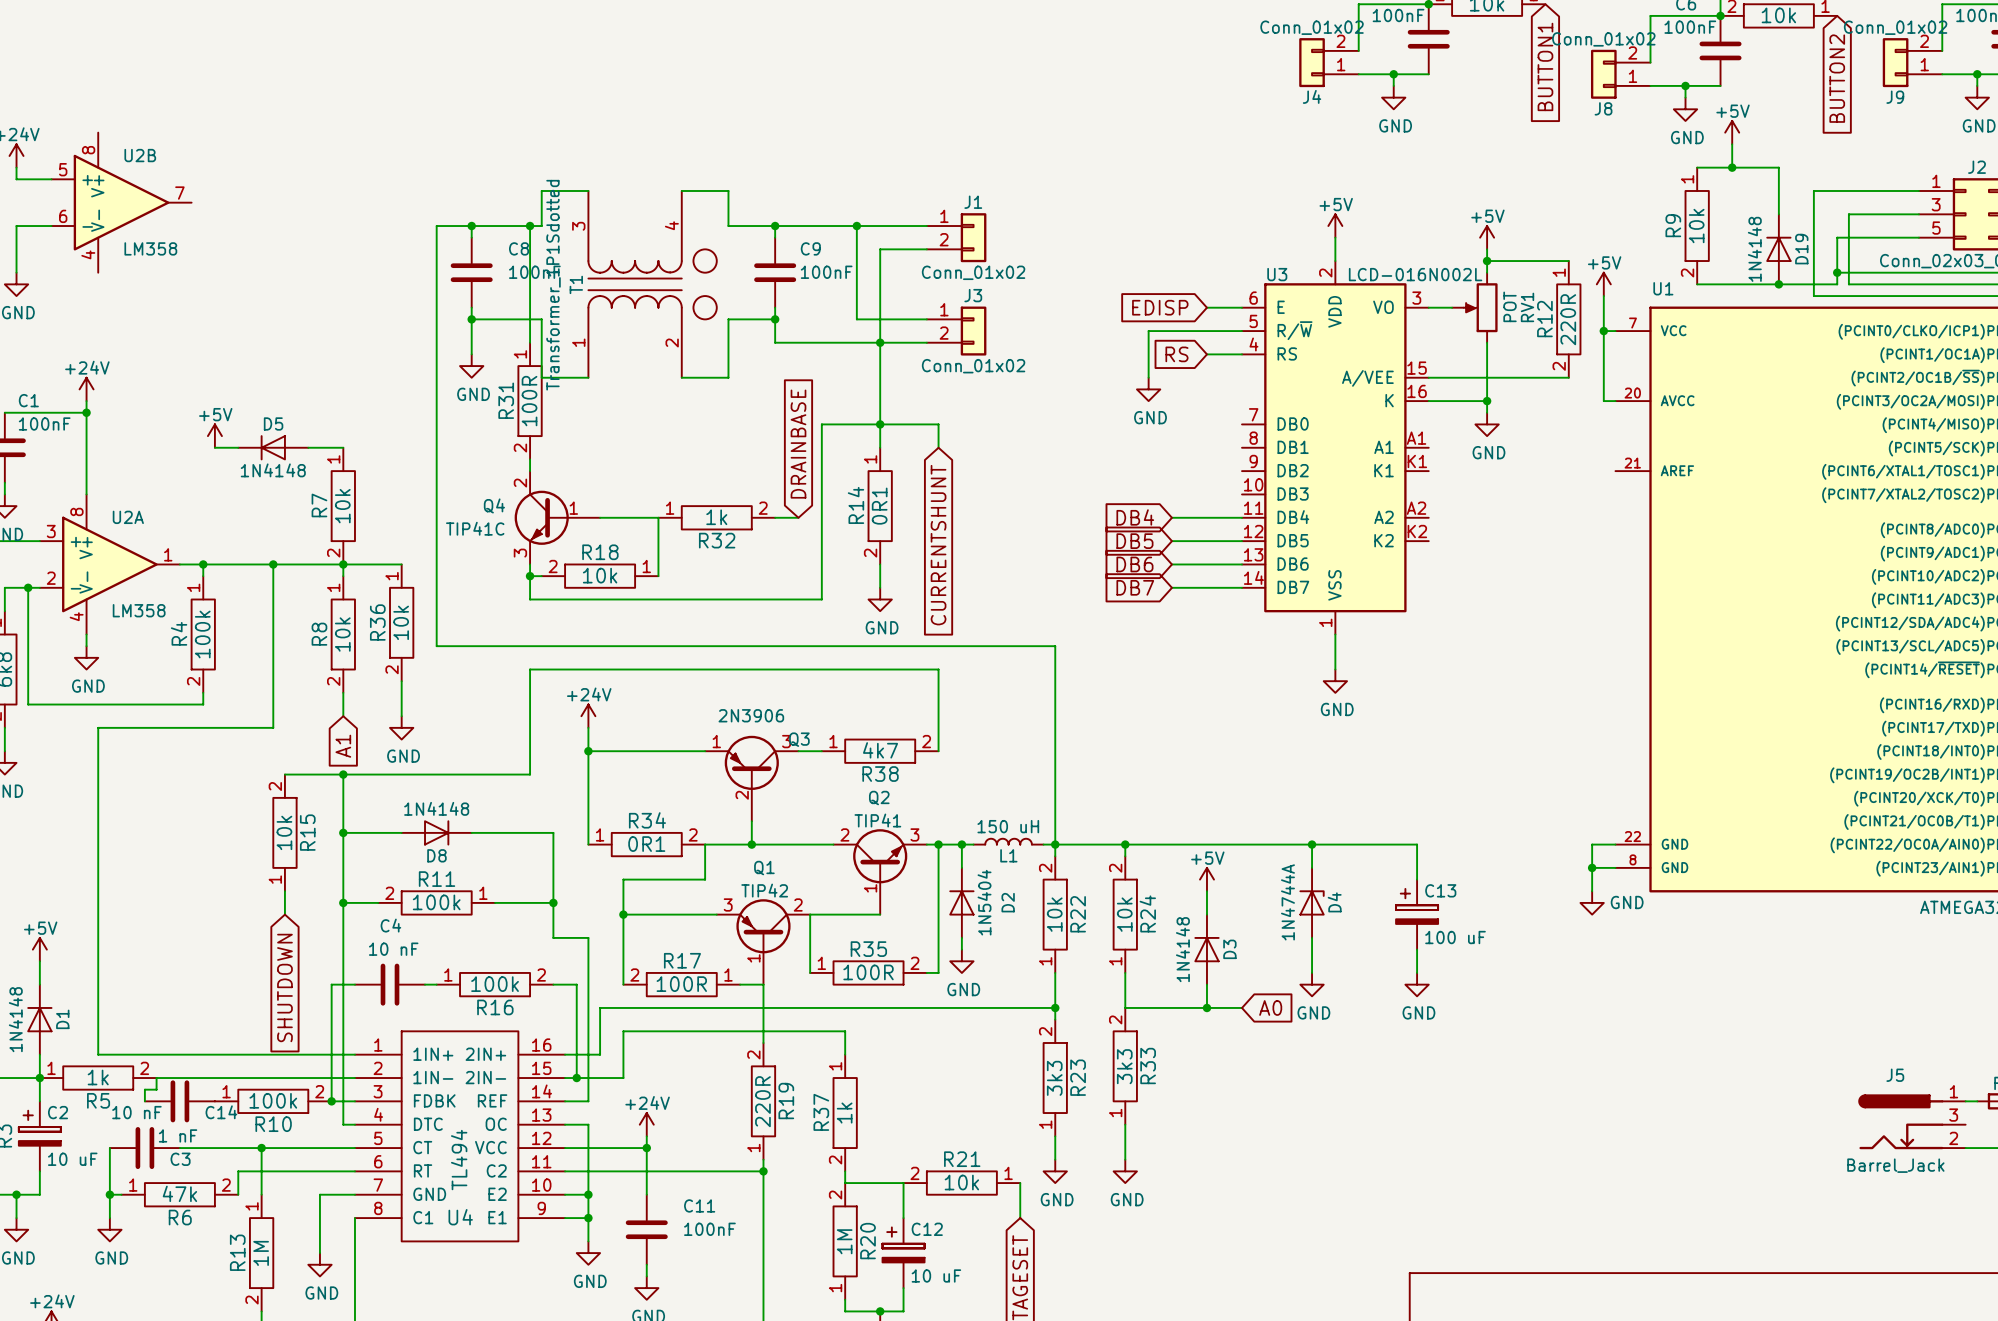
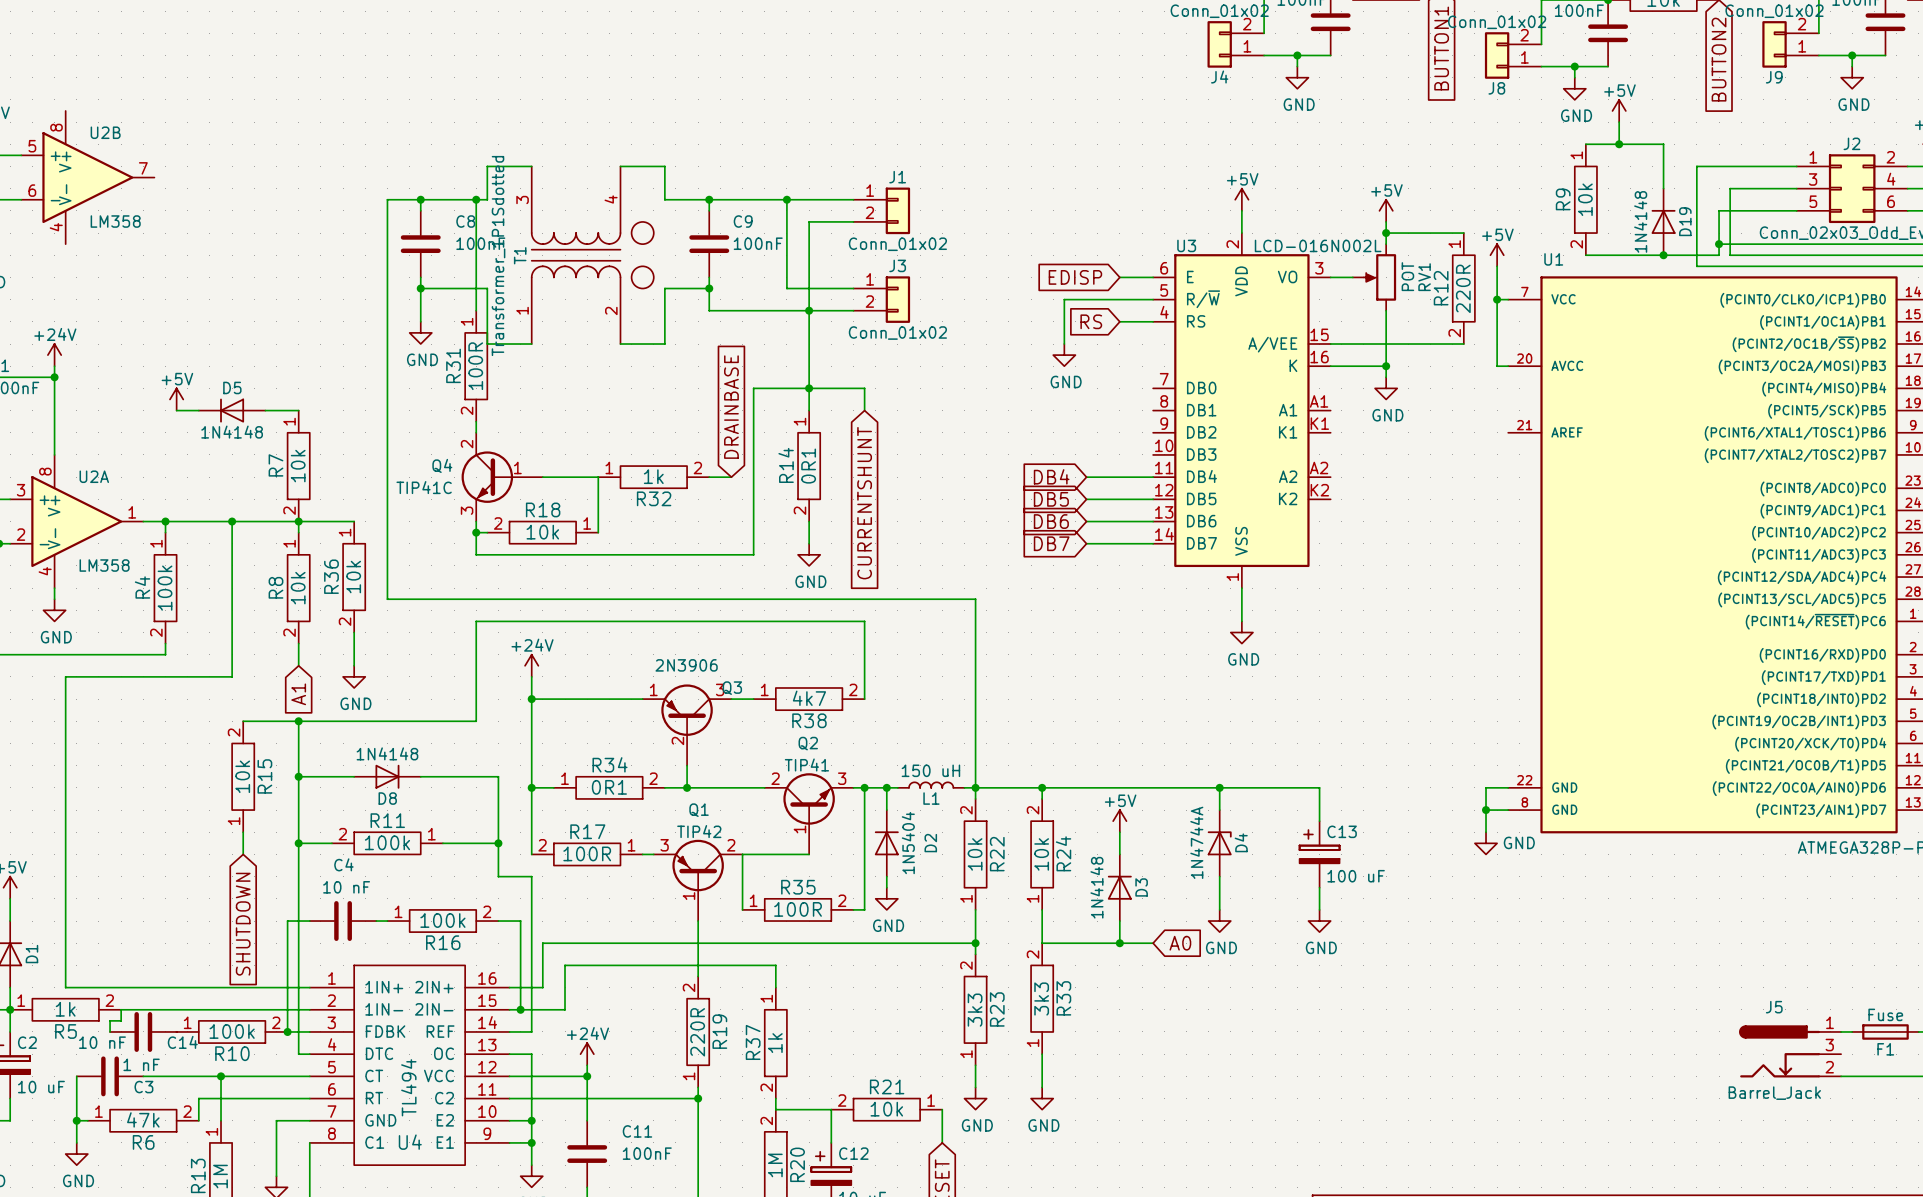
junction: none -> (531, 787)
wire: none -> (553, 787) (531, 787) (531, 854)
R34 position: (646, 844) -> (609, 787)
wire: (728, 844) (705, 844) (705, 879) (623, 879) (623, 984) -> none
wire: (623, 914) (705, 914) -> none
junction: (623, 914) -> none
R17 position: (681, 984) -> (587, 854)
wire: (740, 984) (763, 984) -> none

